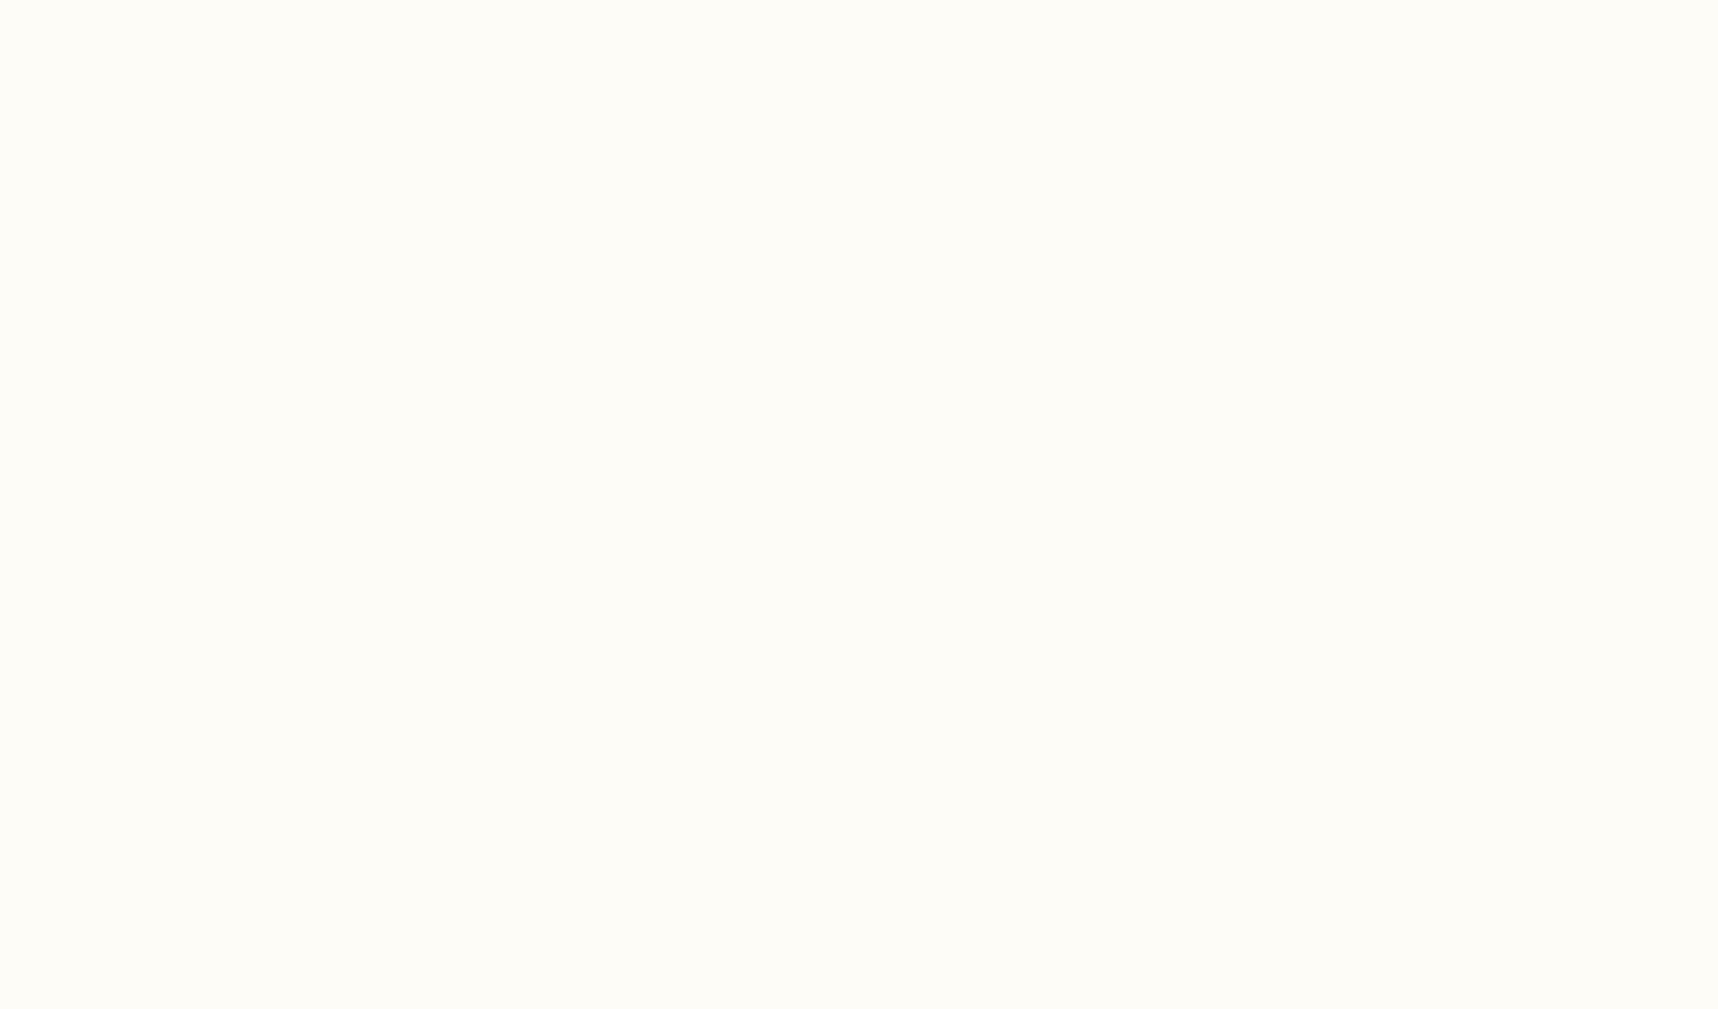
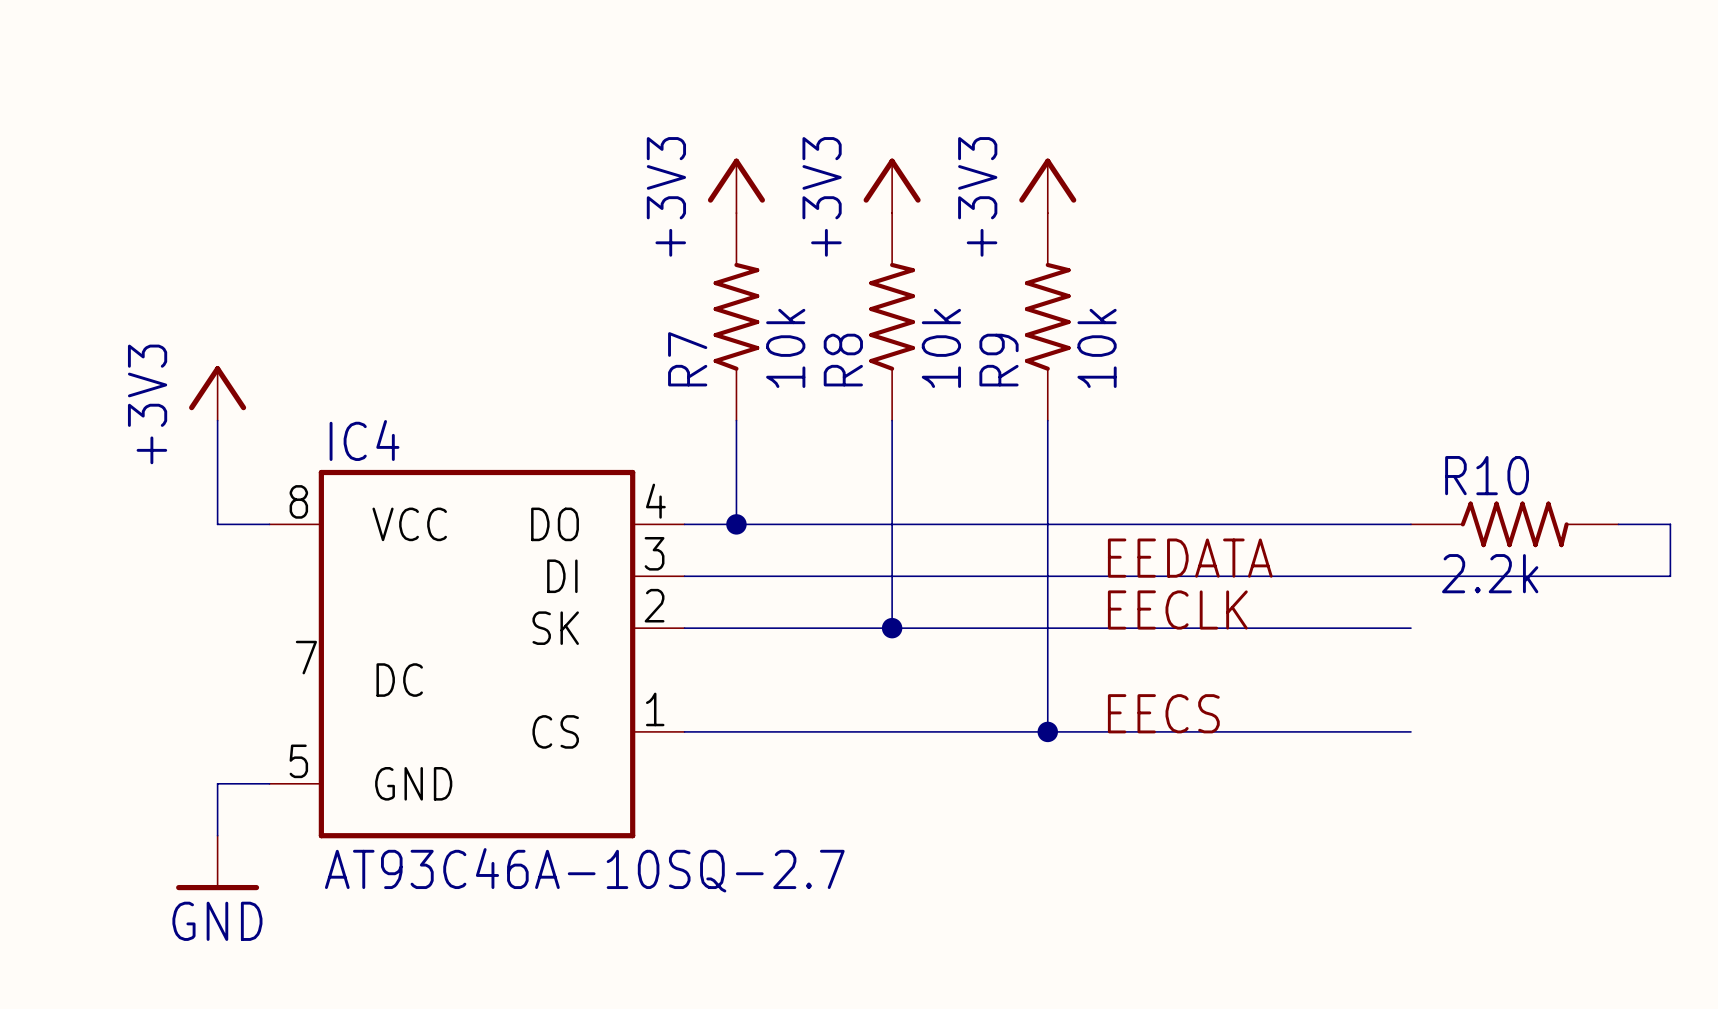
power symbol: none -> +3V3 (736, 185)
power symbol: none -> +3V3 (892, 185)
power symbol: none -> +3V3 (1047, 185)
R7: none -> 10k (736, 316)
R8: none -> 10k (892, 316)
R9: none -> 10k (1047, 316)
power symbol: none -> +3V3 (217, 393)
wire: none -> (217, 420) (217, 524) (269, 524)
wire: none -> (736, 420) (736, 524)
wire: none -> (892, 420) (892, 628)
wire: none -> (1047, 420) (1047, 731)
wire: none -> (684, 524) (1410, 524)
junction: none -> (736, 524)
R10: none -> 2.2k (1514, 524)
wire: none -> (1618, 524) (1670, 524) (1670, 576) (684, 576)
label: none -> EEDATA (1190, 558)
label: none -> EECLK (1177, 609)
wire: none -> (684, 628) (1410, 628)
junction: none -> (892, 628)
IC4: none -> AT93C46A-10SQ-2.7 (477, 654)
label: none -> EECS (1163, 713)
wire: none -> (684, 731) (1410, 731)
junction: none -> (1047, 731)
wire: none -> (269, 783) (217, 783) (217, 835)
power symbol: none -> GND (217, 862)

